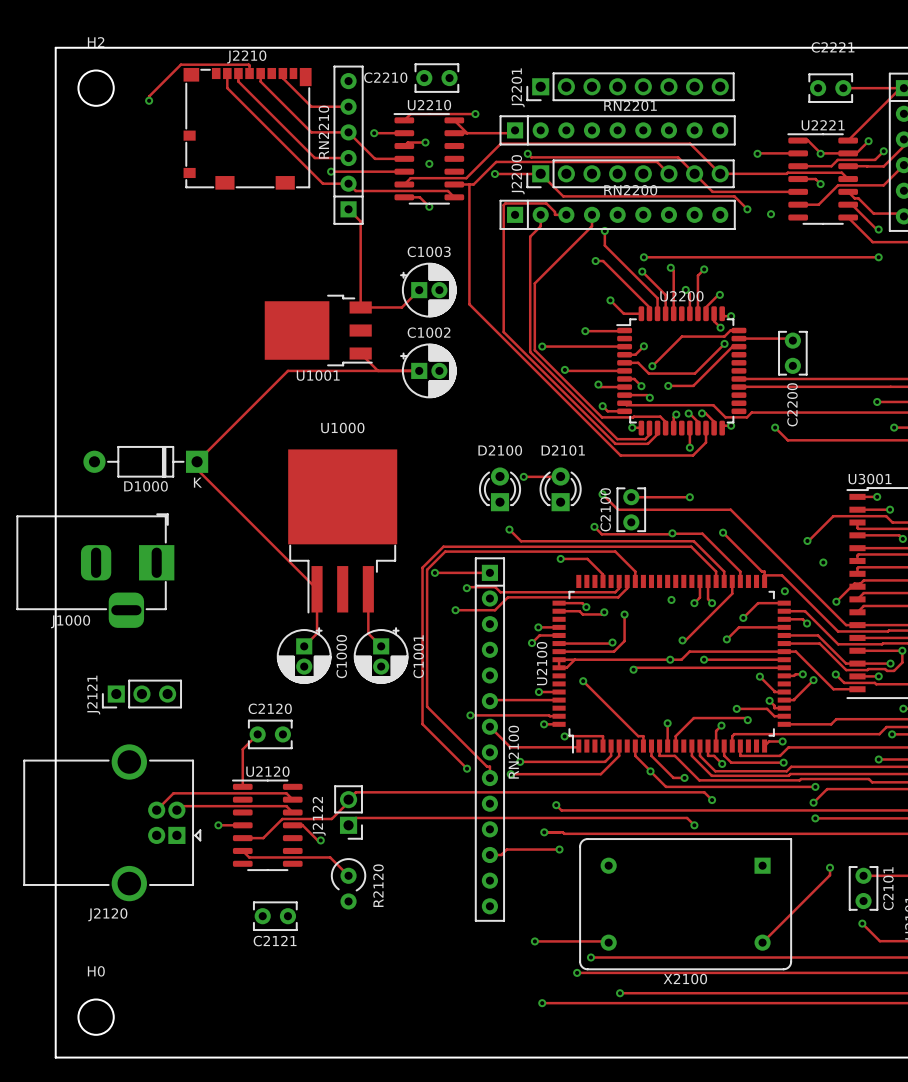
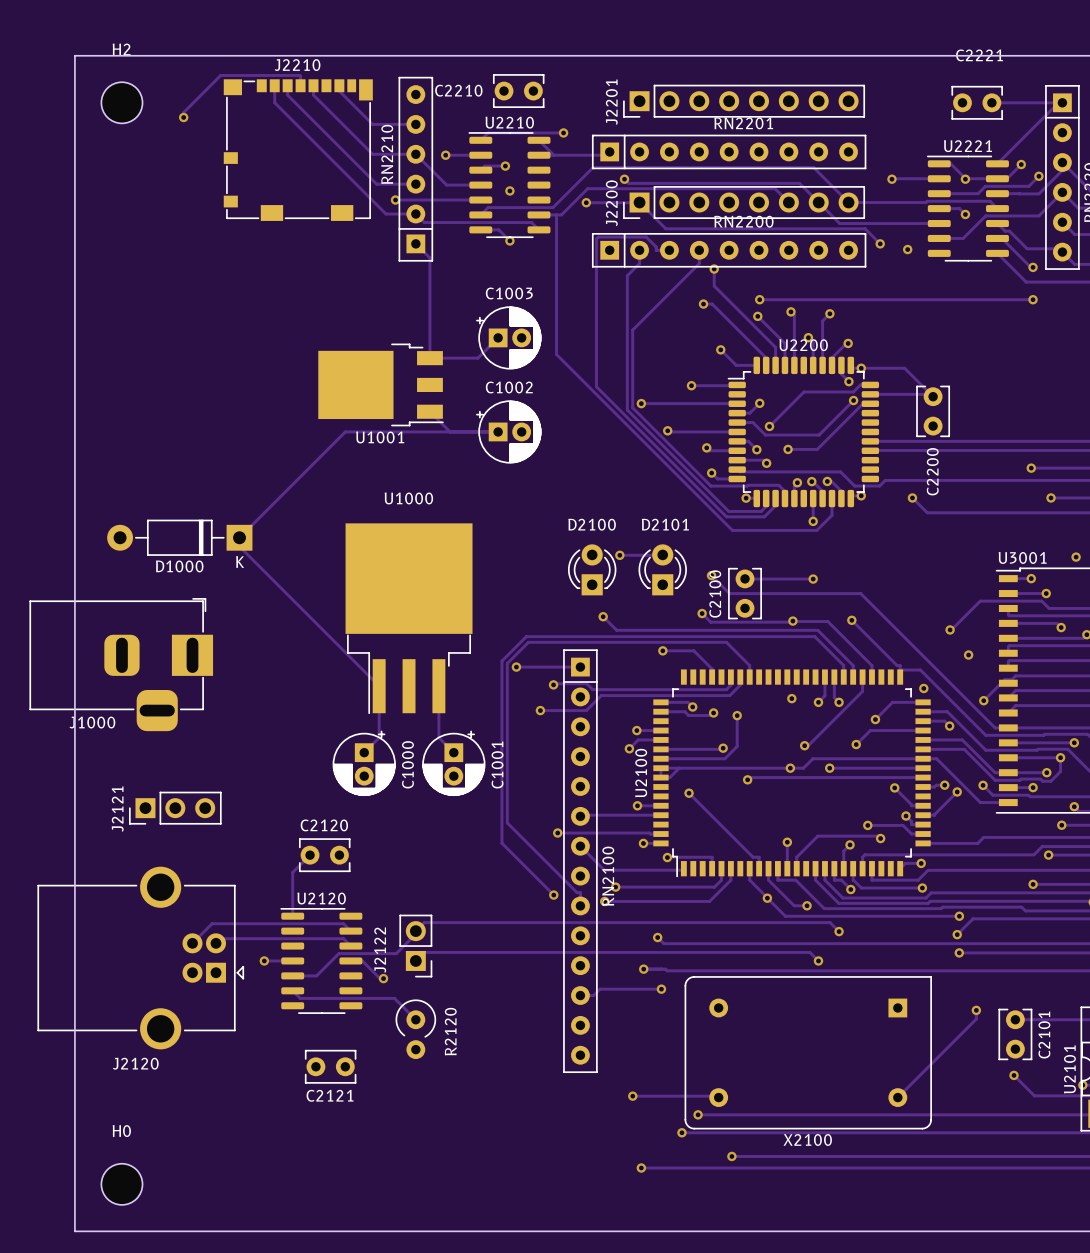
track: none -> (861, 368) (904, 368) (930, 394)

